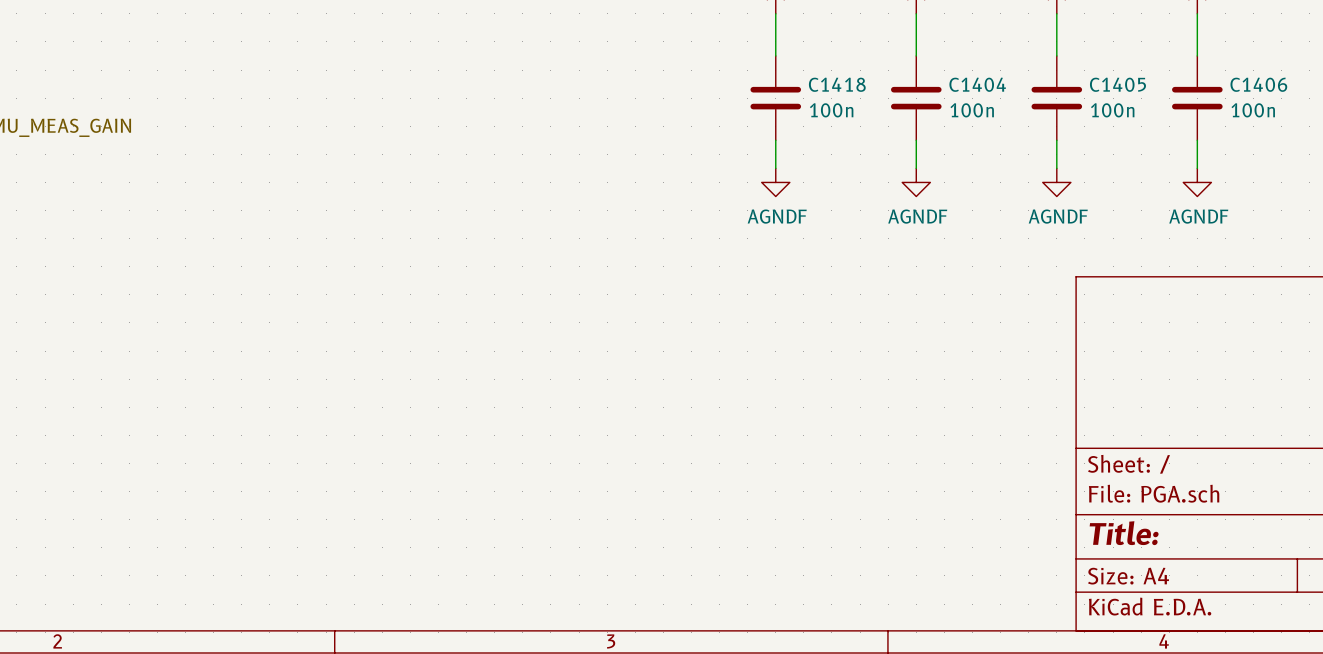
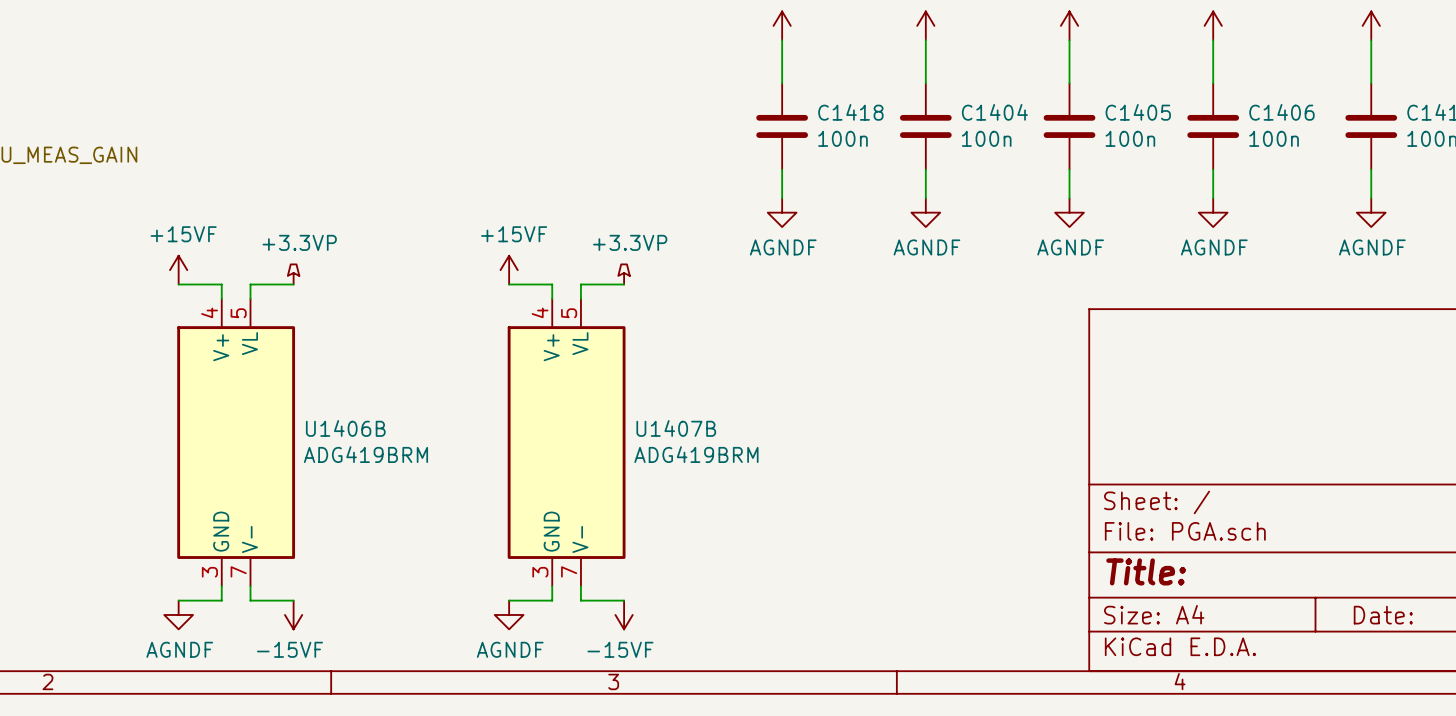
power symbol: none -> +15VF (178, 270)
power symbol: none -> +15VF (509, 270)
power symbol: none -> +3.3VP (293, 274)
power symbol: none -> +3.3VP (624, 274)
wire: none -> (178, 284) (221, 284) (221, 298)
wire: none -> (293, 284) (250, 284) (250, 298)
wire: none -> (509, 284) (552, 284) (552, 298)
wire: none -> (624, 284) (580, 284) (580, 298)
U1406B: none -> ADG419BRM (236, 442)
U1407B: none -> ADG419BRM (566, 442)
wire: none -> (221, 586) (221, 600) (178, 600)
wire: none -> (250, 586) (250, 600) (293, 600)
wire: none -> (552, 586) (552, 600) (509, 600)
wire: none -> (580, 586) (580, 600) (624, 600)
power symbol: none -> AGNDF (178, 614)
power symbol: none -> -15VF (293, 614)
power symbol: none -> AGNDF (509, 614)
power symbol: none -> -15VF (624, 614)

